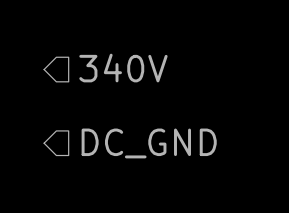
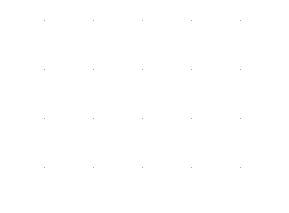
hierarchical label: 340V (123, 68) -> none
hierarchical label: DC_GND (149, 143) -> none

